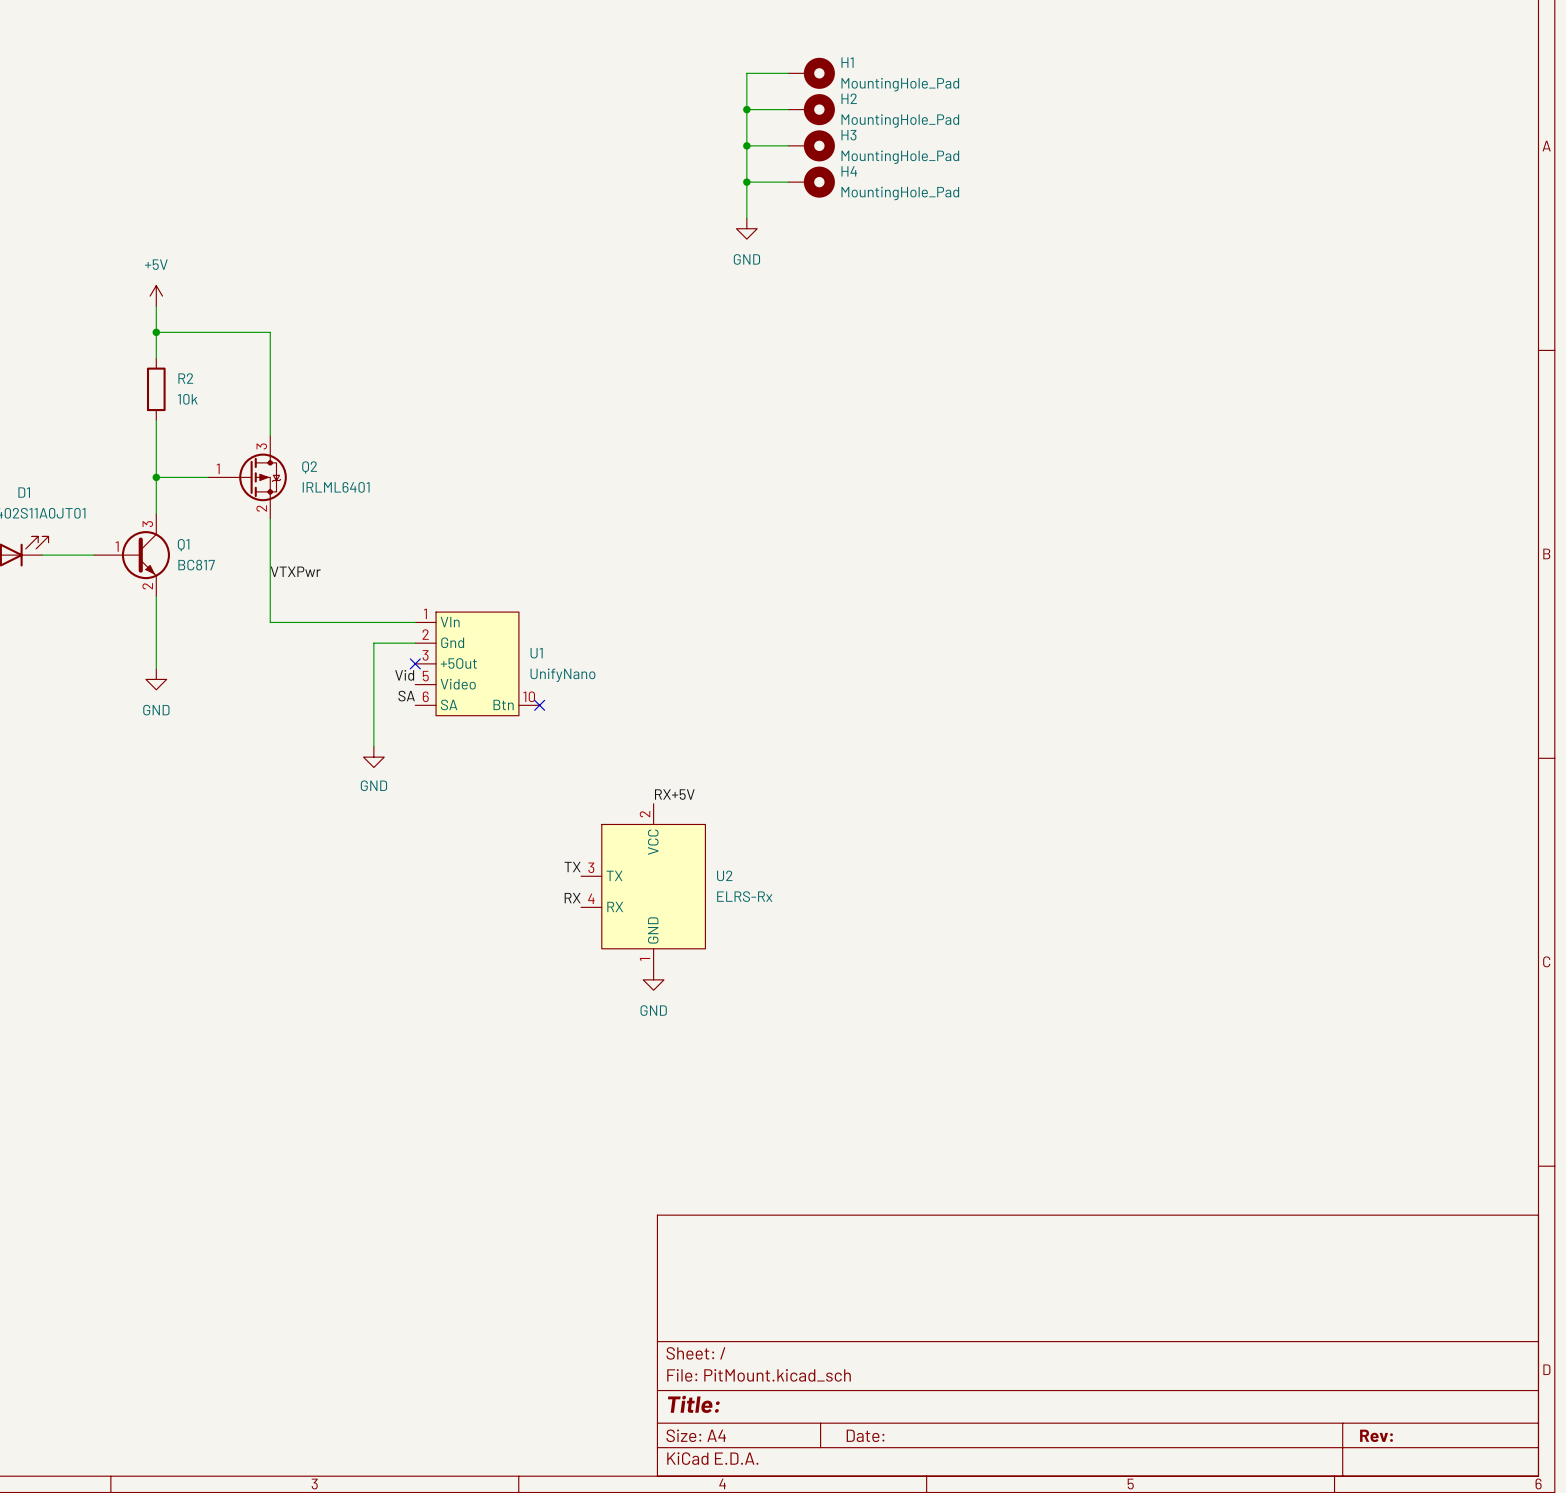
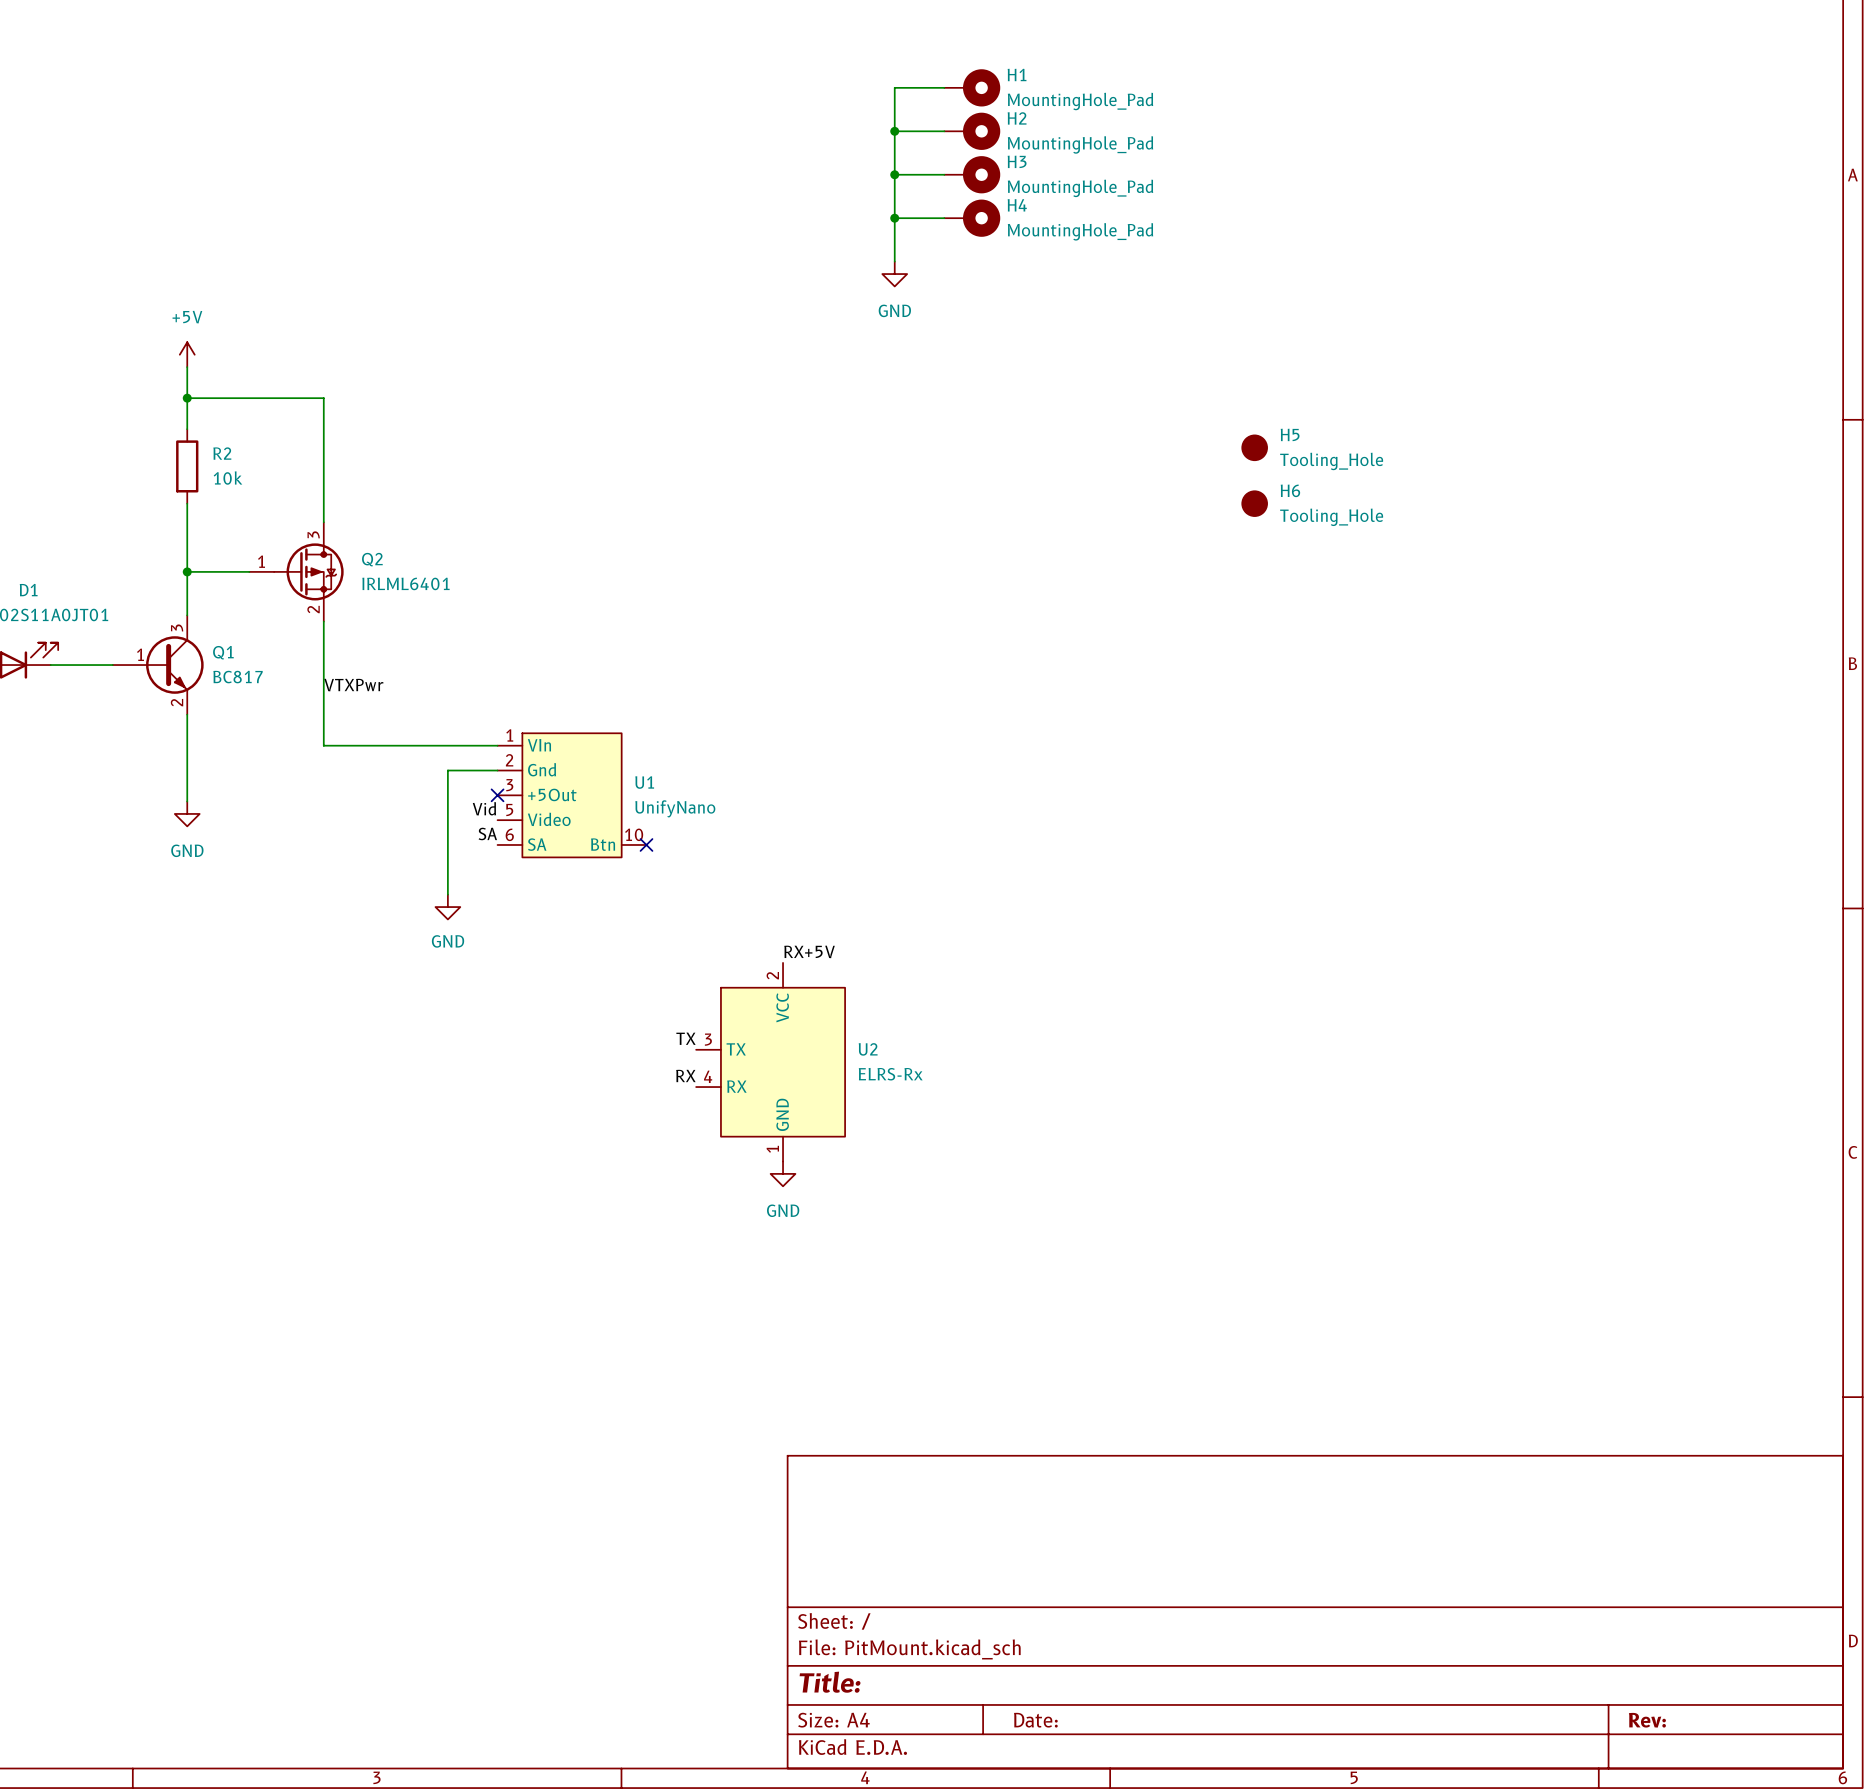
H5: none -> Tooling_Hole (1254, 447)
H6: none -> Tooling_Hole (1254, 503)

